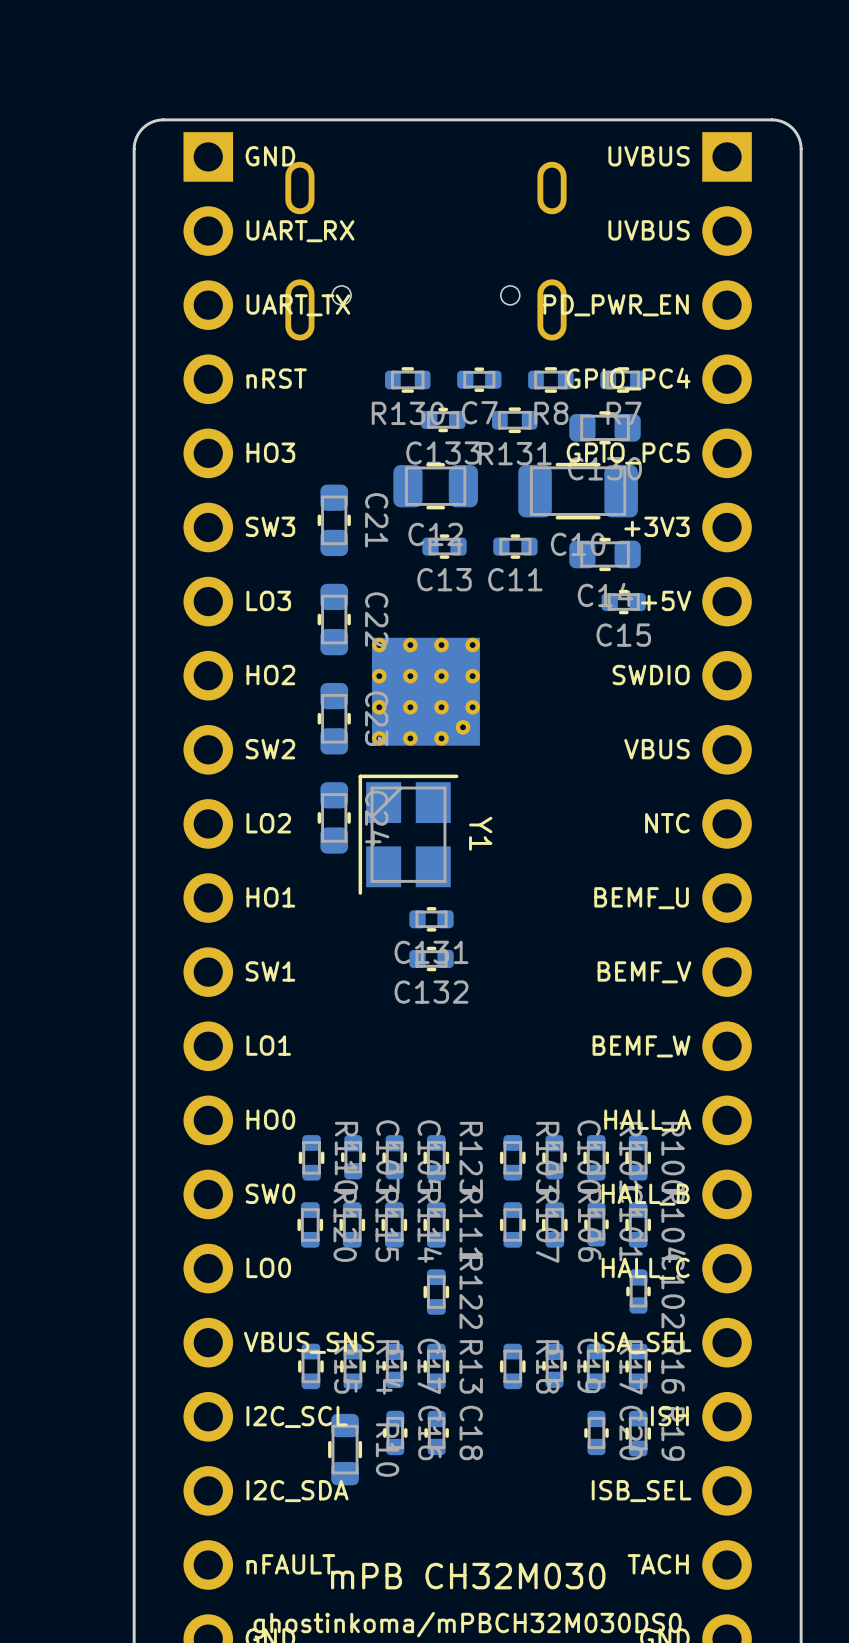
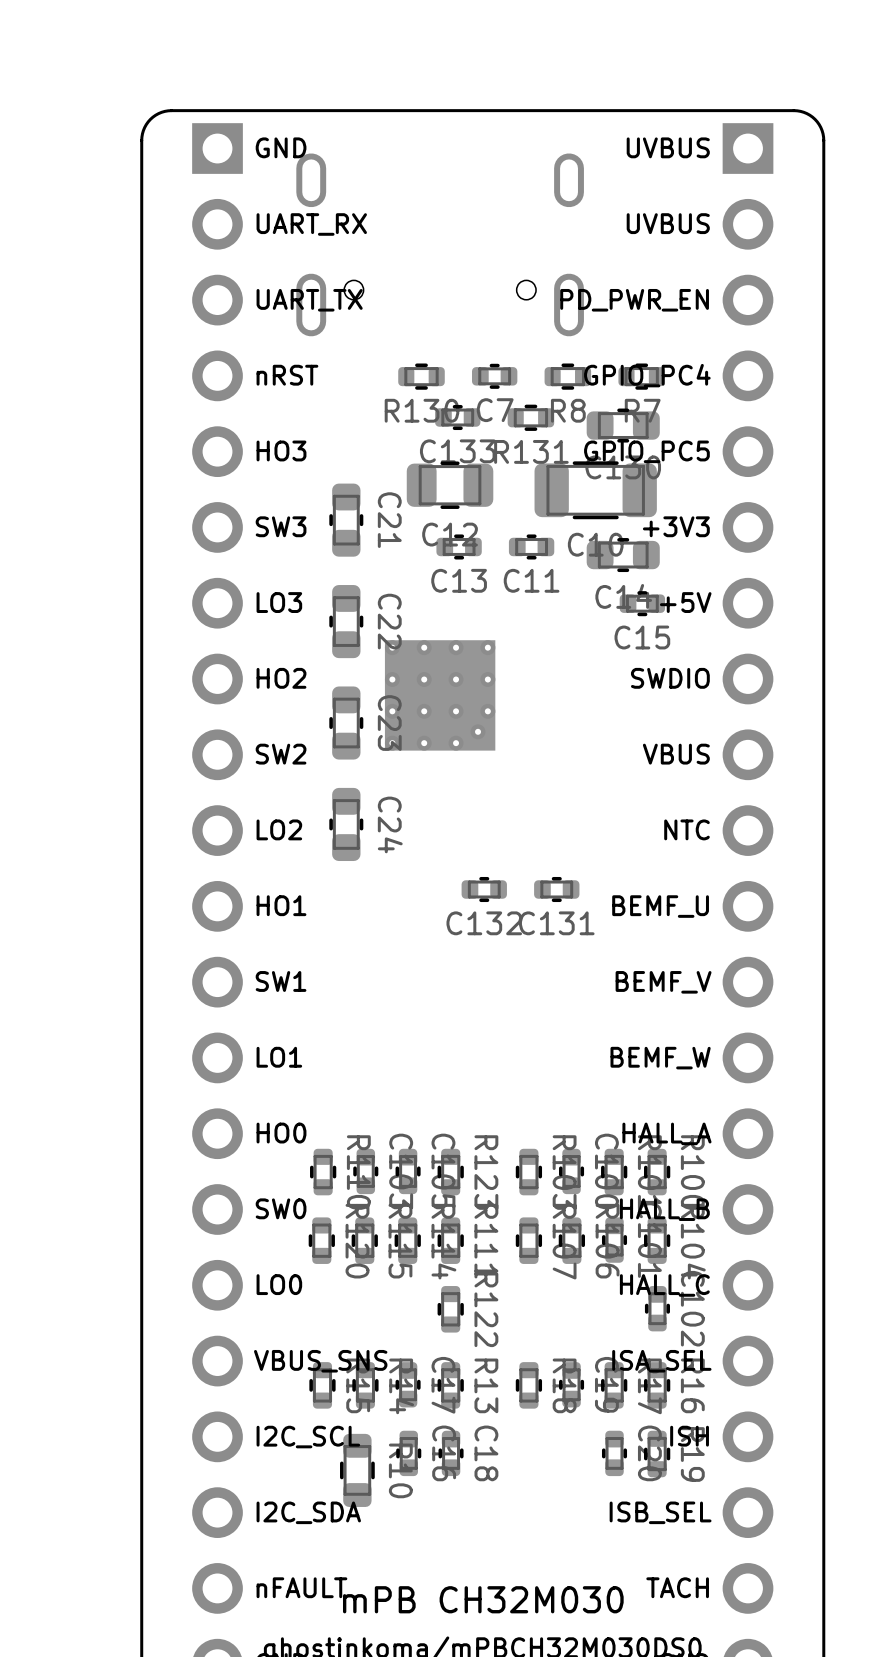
Y1: (408, 834) -> none
C131 position: (431, 919) -> (556, 889)
C132 position: (431, 958) -> (484, 889)

